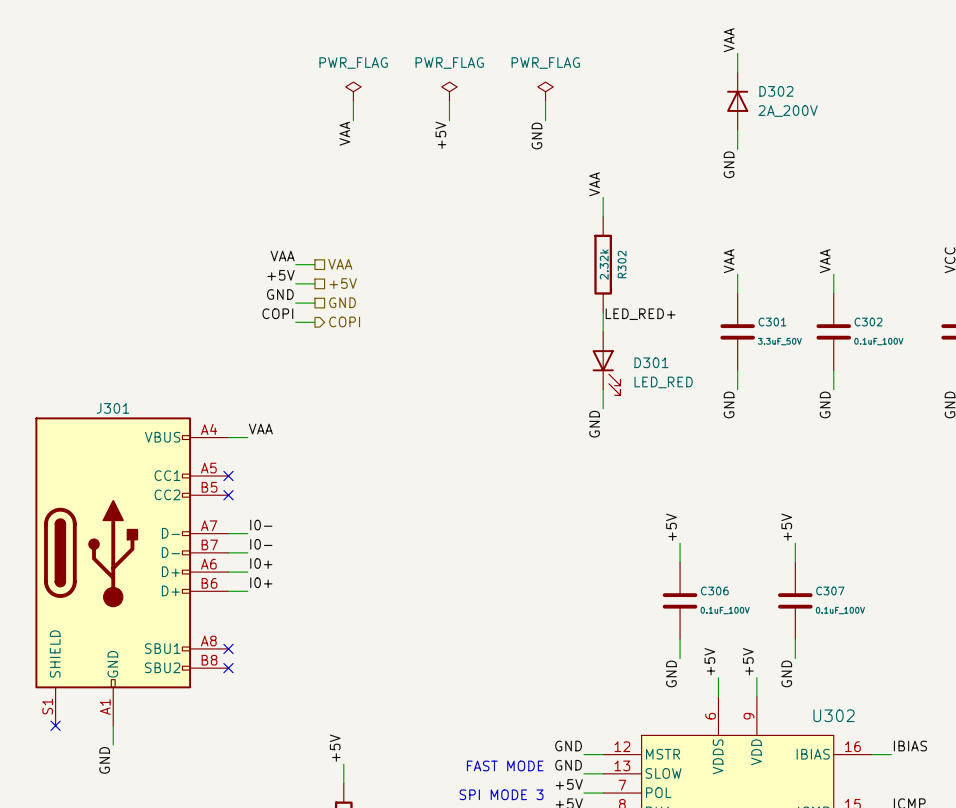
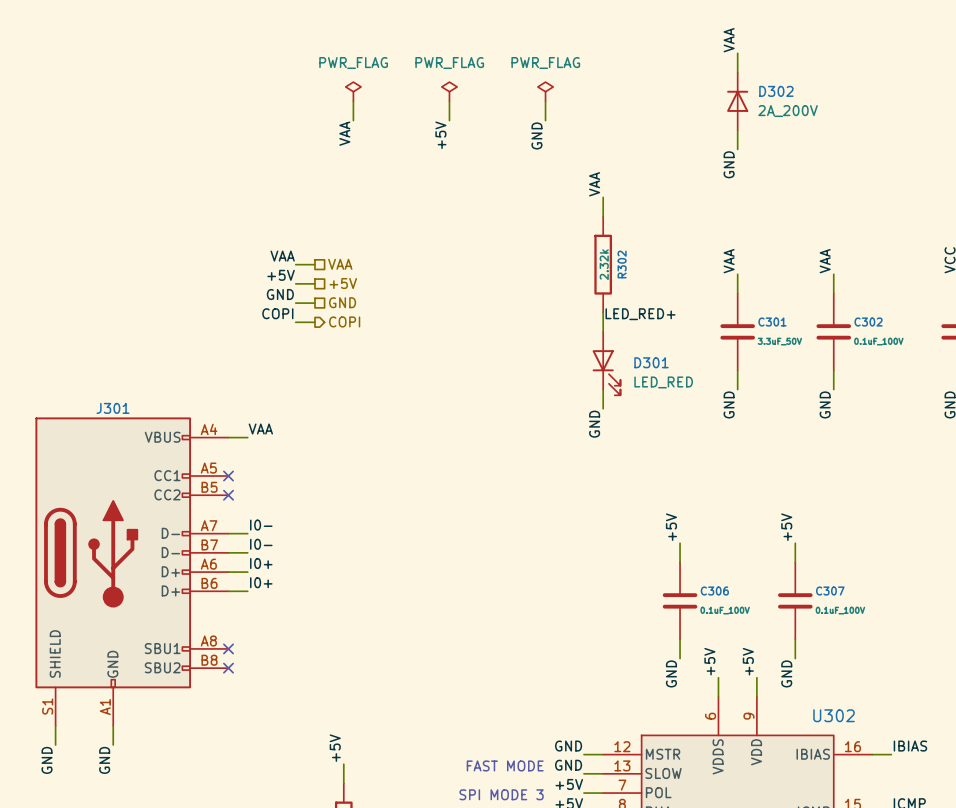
wire: none -> (55, 725) (55, 745)
no-connect mark: (55, 725) -> none
label: none -> GND (47, 760)

